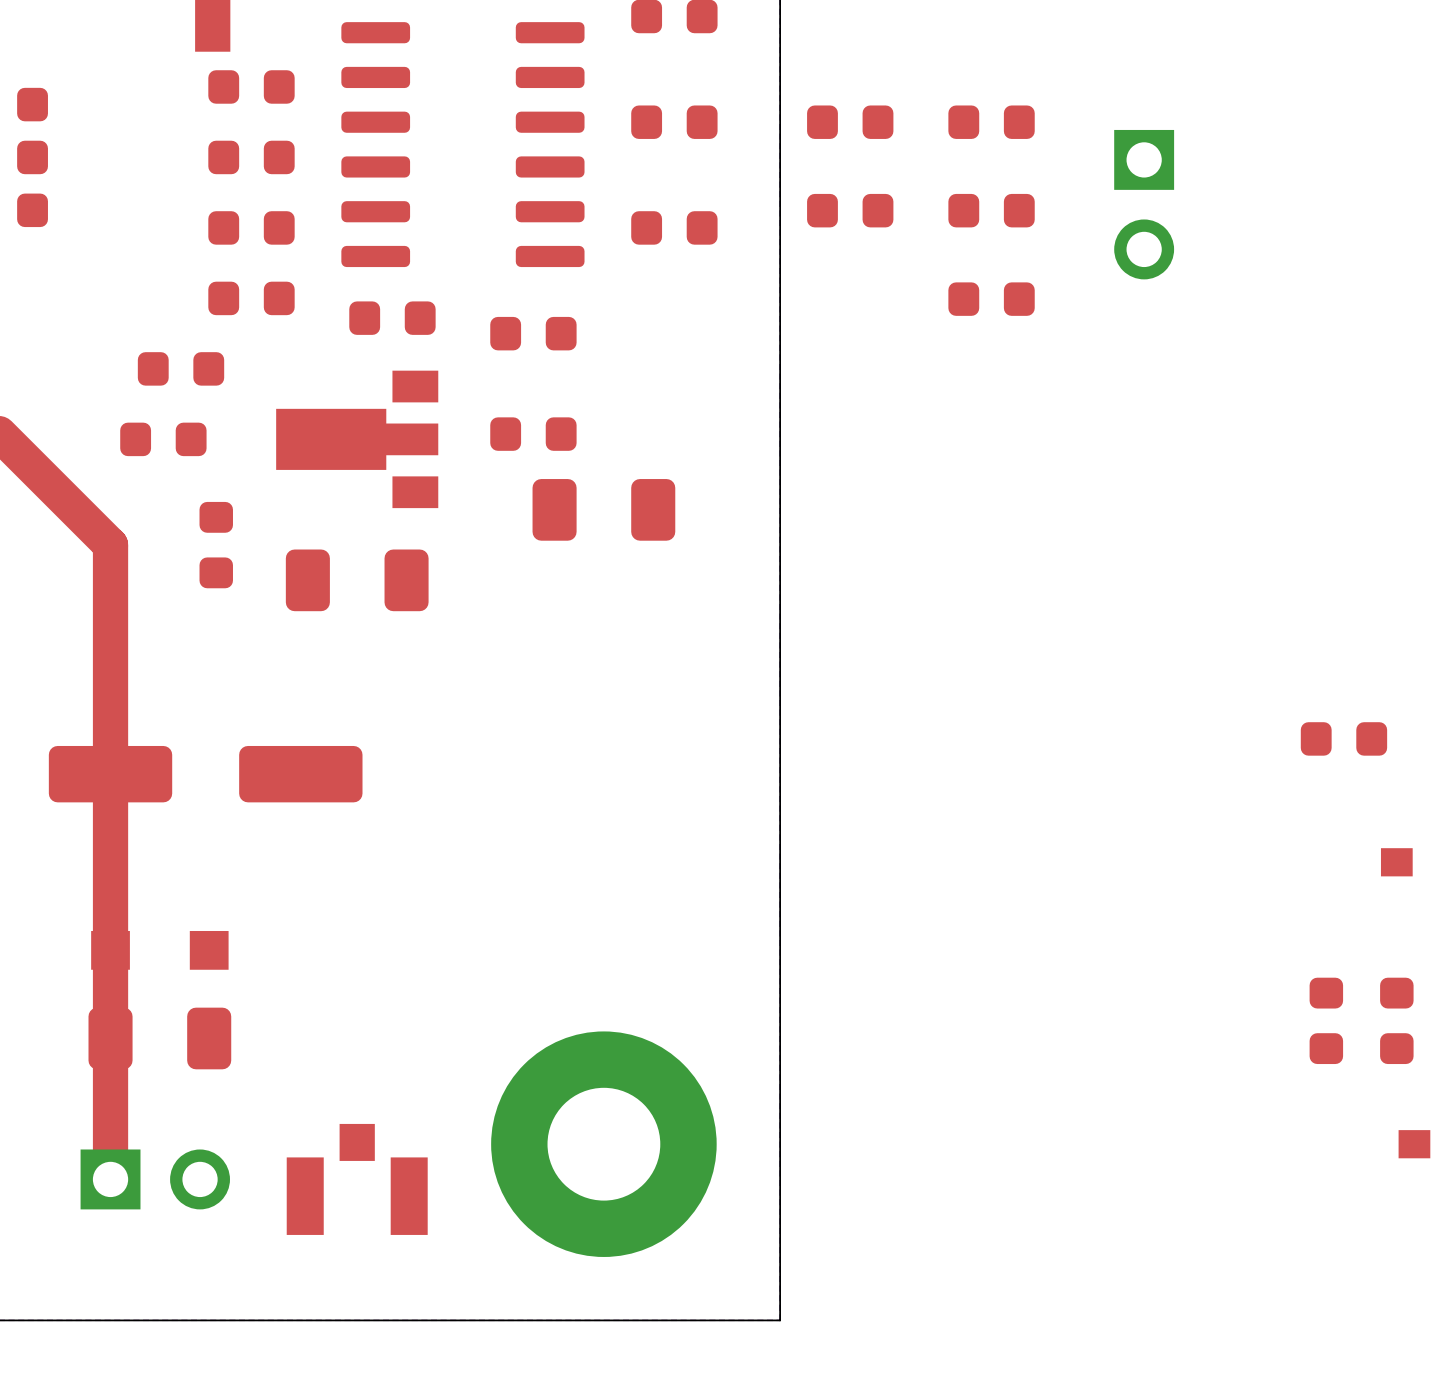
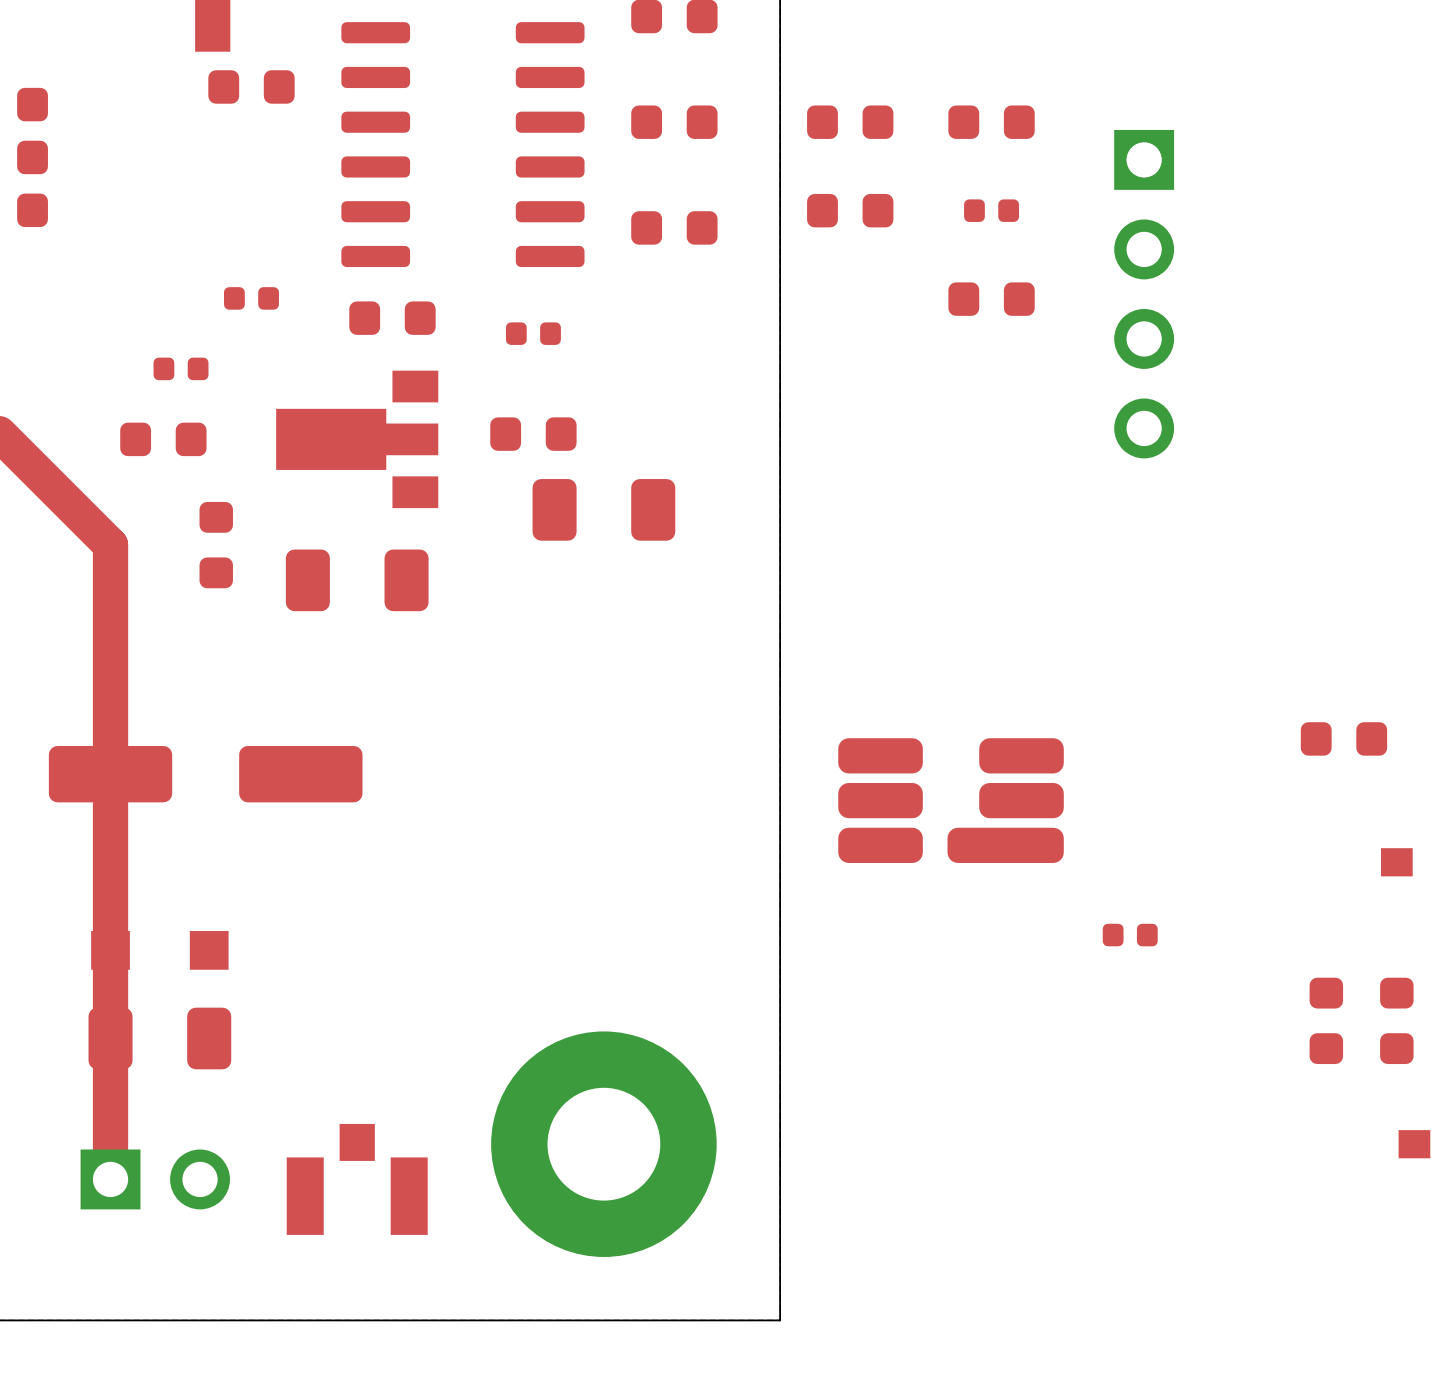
part: (251, 157) -> none
part footprint: [948, 193, 1035, 228] -> [964, 199, 1020, 222]
part: (251, 227) -> none
part footprint: [208, 281, 295, 316] -> [224, 287, 279, 310]
part: none -> (1144, 294)
part footprint: [490, 316, 577, 351] -> [505, 322, 561, 345]
part footprint: [137, 352, 225, 386] -> [153, 357, 209, 381]
part: none -> (951, 800)
part: none -> (1130, 935)

